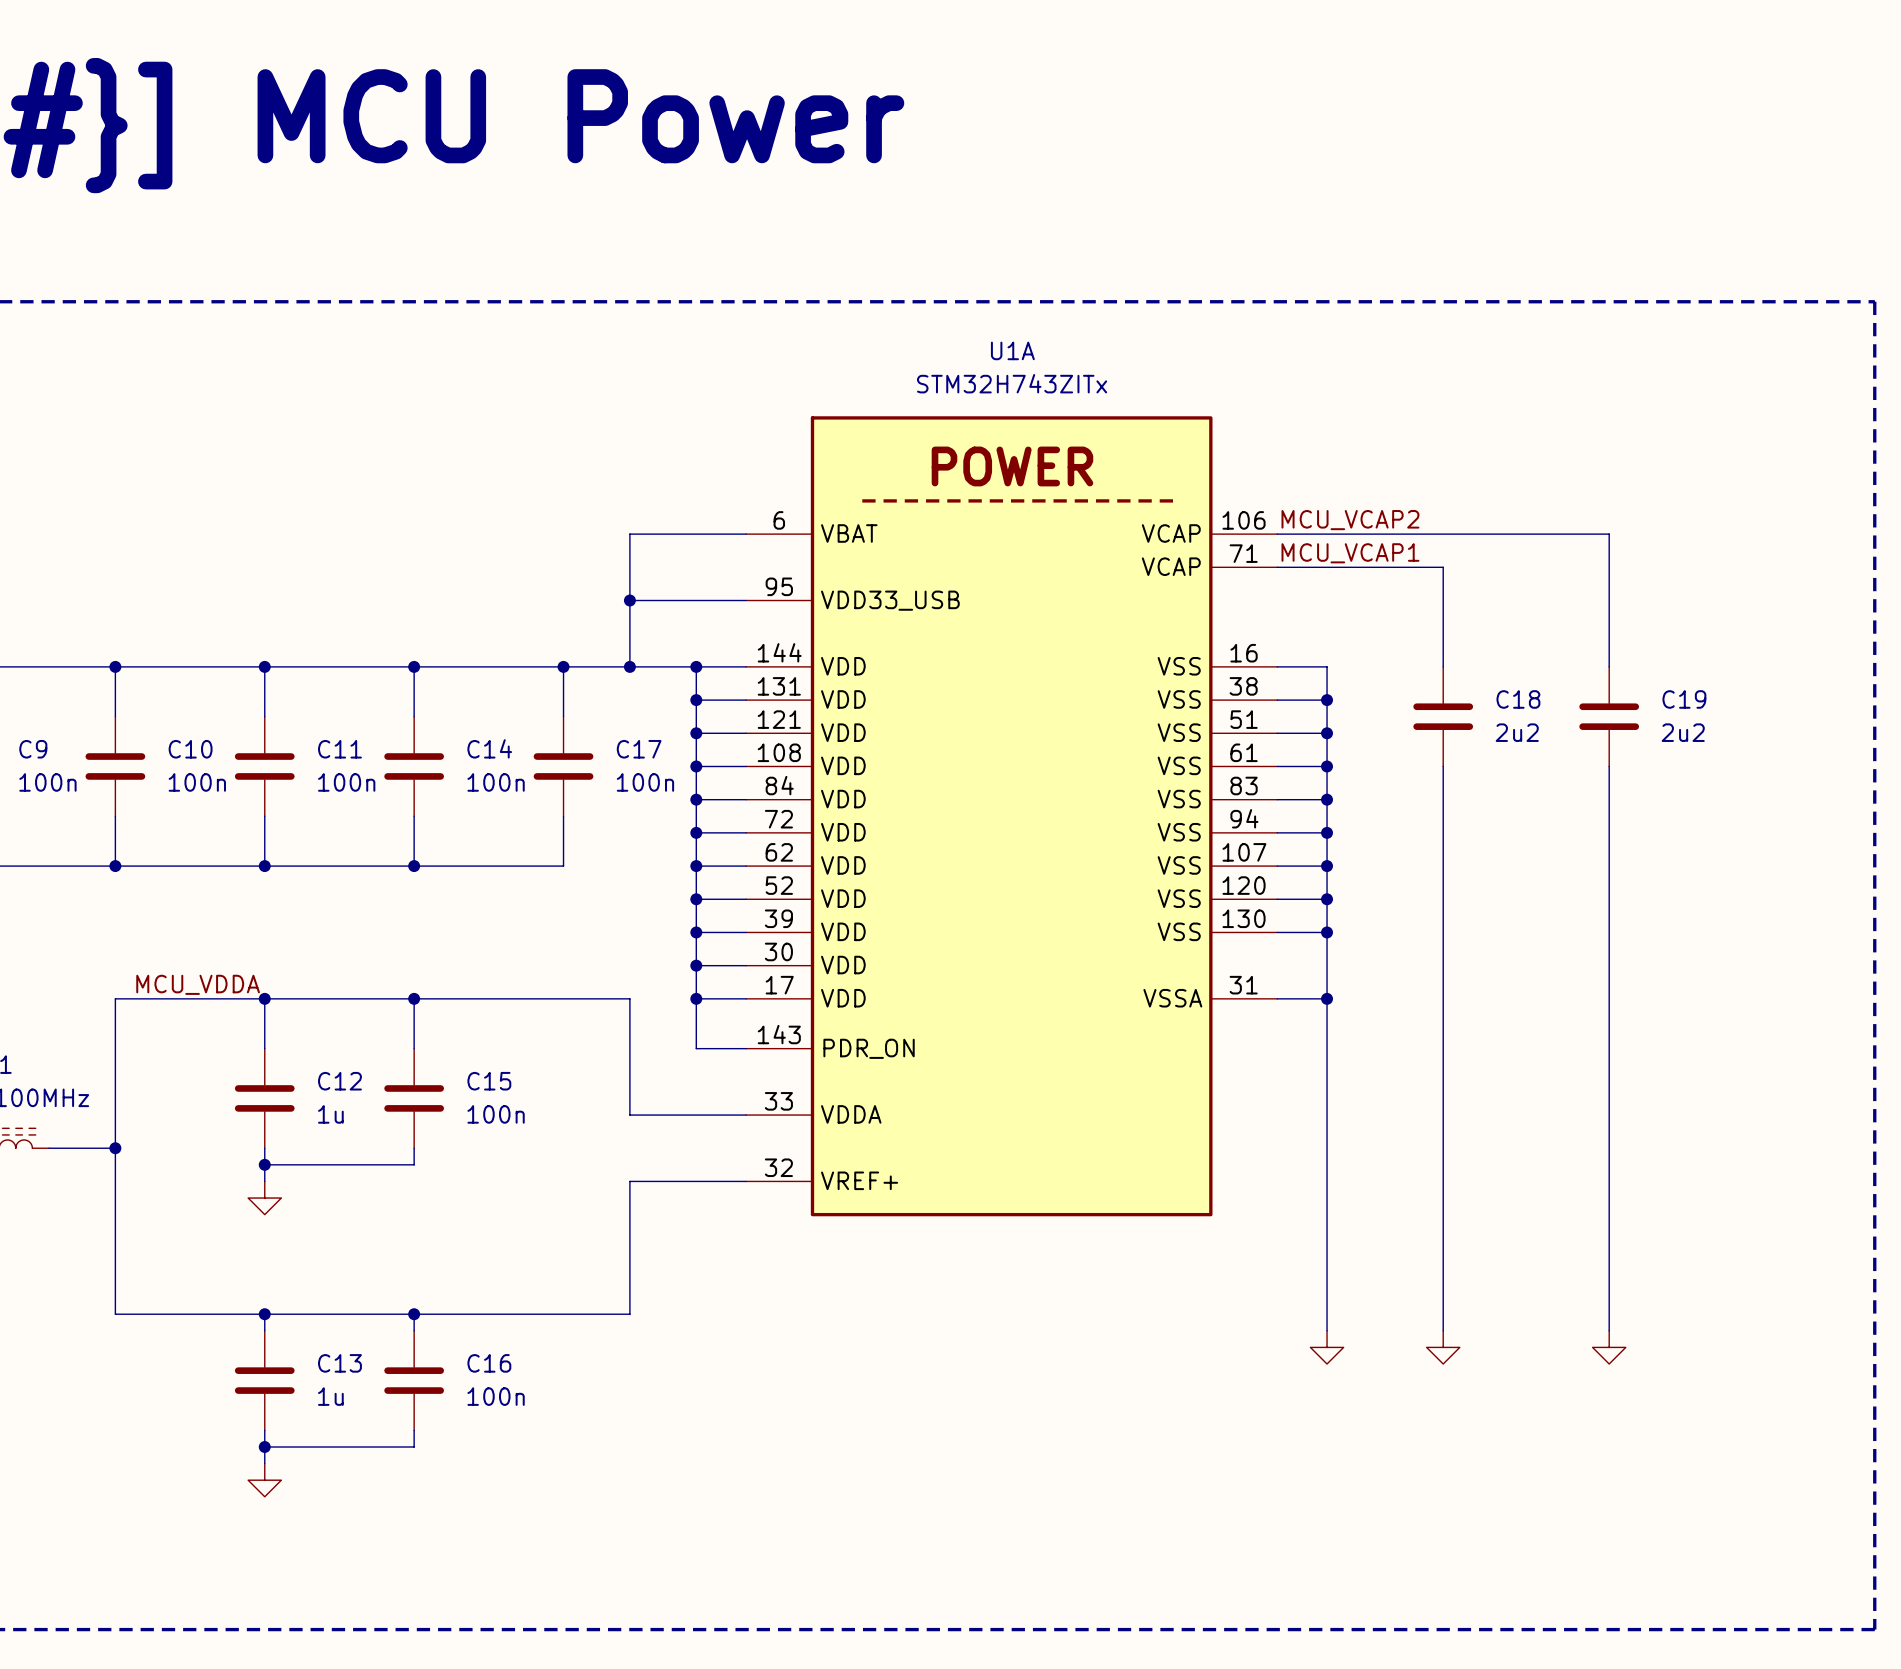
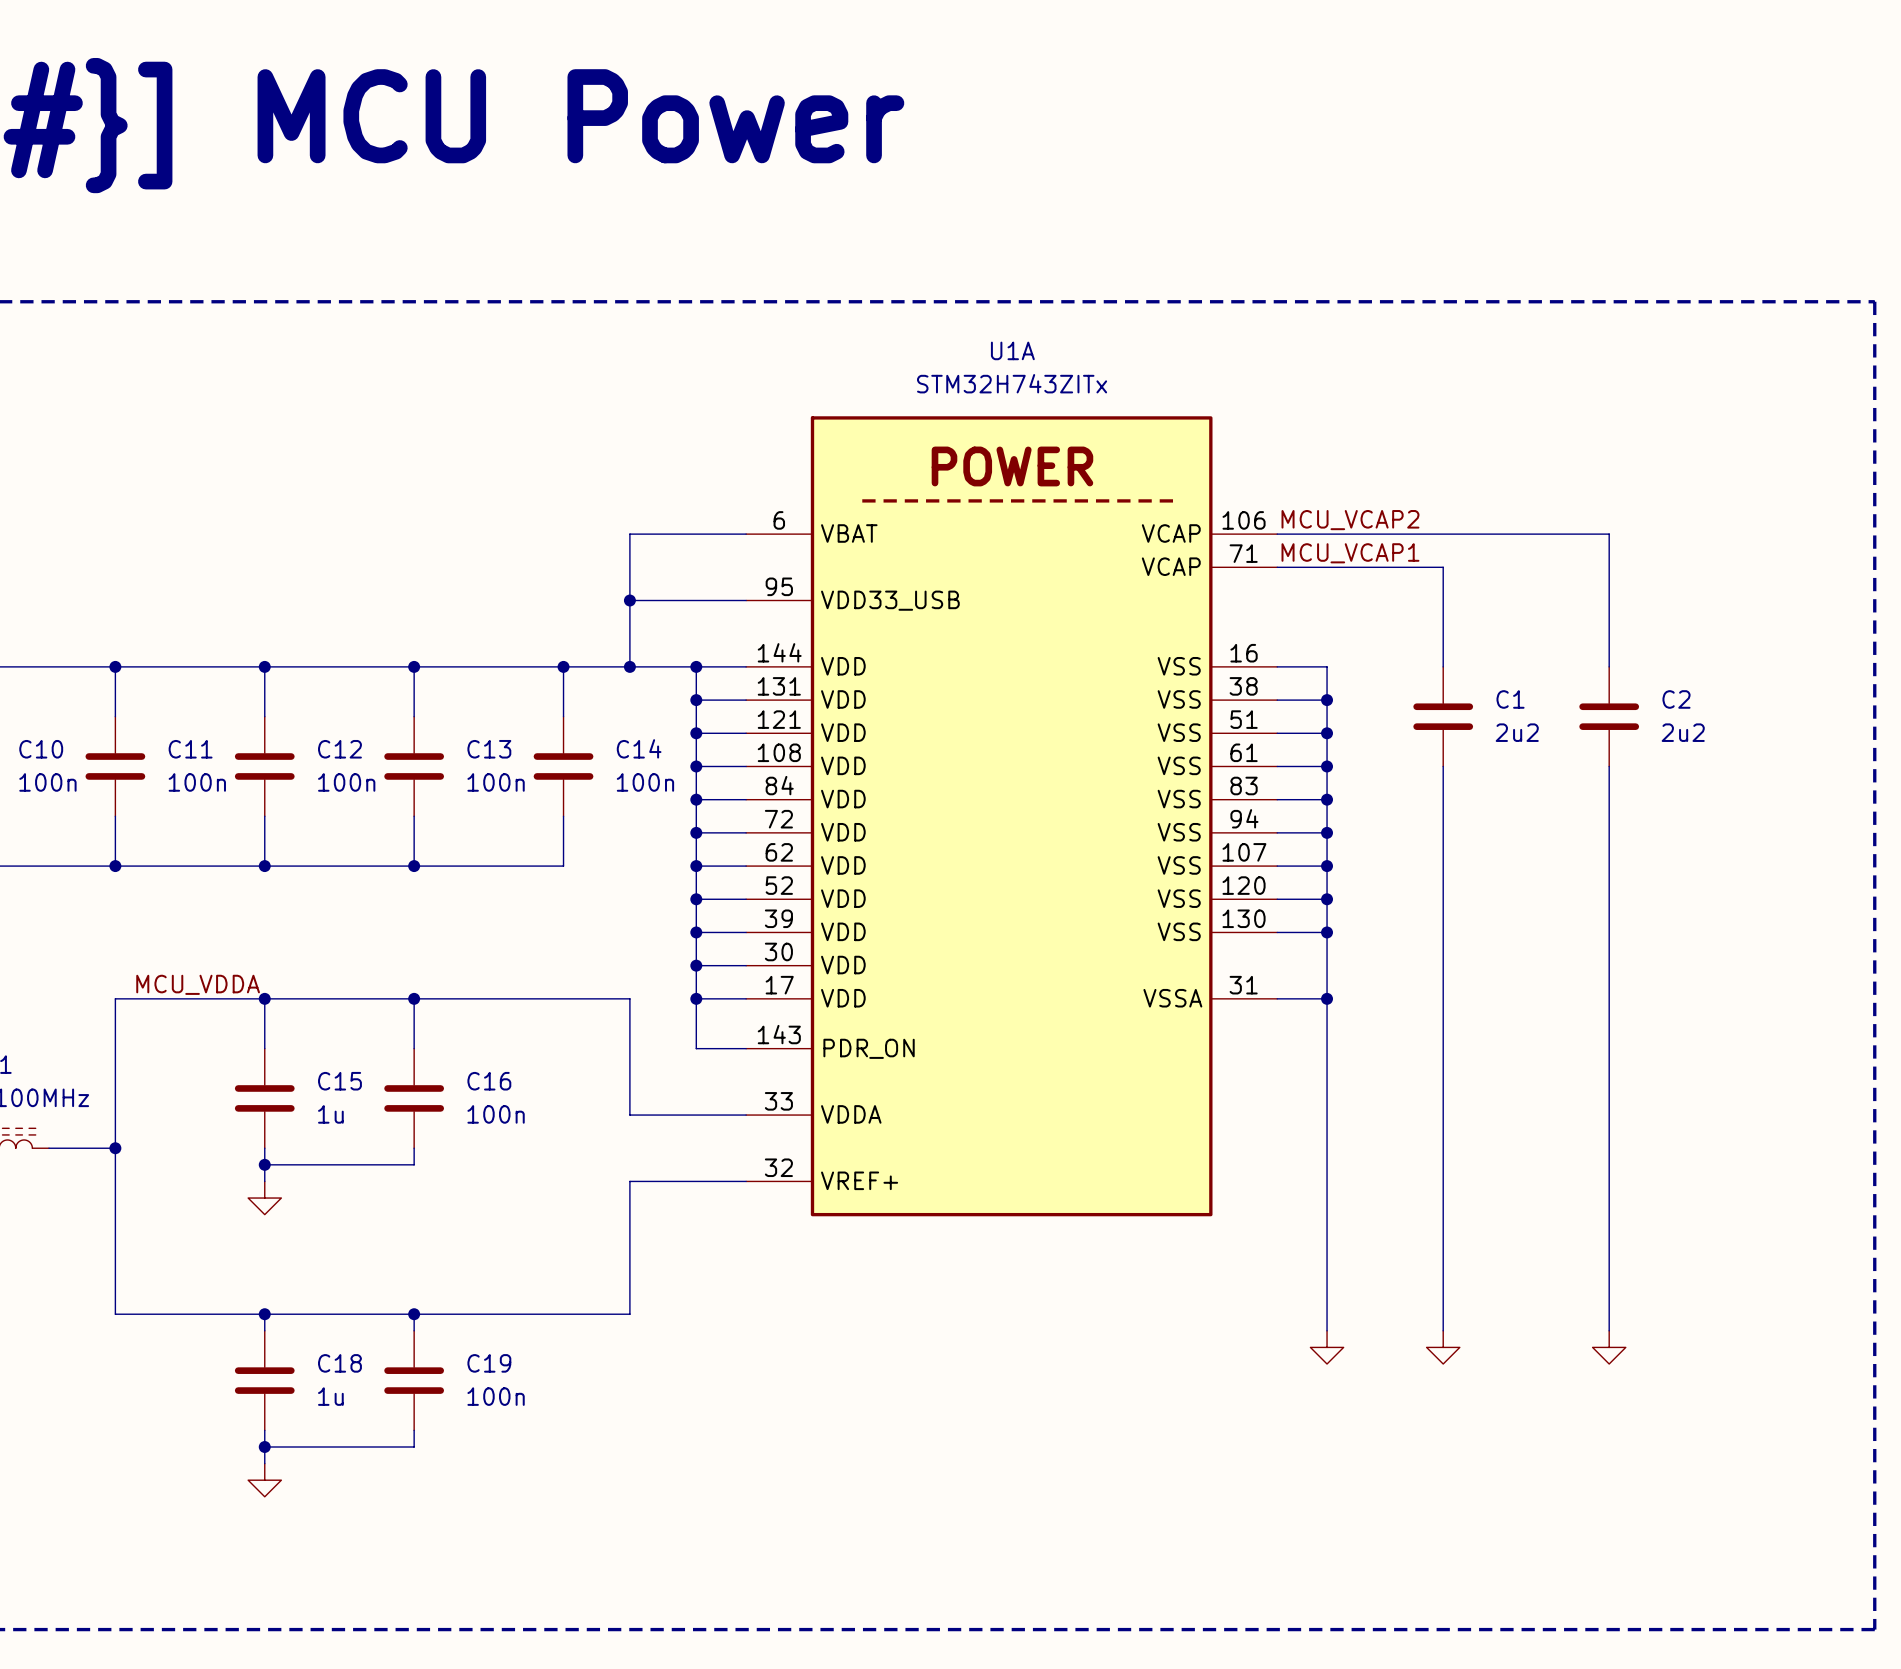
C18 name: C18 (1518, 699) -> C1 (1510, 699)
C19 name: C19 (1684, 699) -> C2 (1676, 699)
C14 name: C14 (489, 748) -> C13 (489, 749)
C9 name: C9 (33, 749) -> C10 (41, 749)
C10 name: C10 (190, 749) -> C11 (190, 749)
C11 name: C11 (339, 749) -> C12 (339, 749)
C17 name: C17 (639, 749) -> C14 (639, 748)
C12 name: C12 (339, 1081) -> C15 (339, 1081)
C15 name: C15 (489, 1081) -> C16 (489, 1081)
C13 name: C13 (339, 1363) -> C18 (339, 1363)
C16 name: C16 (489, 1363) -> C19 (489, 1363)

